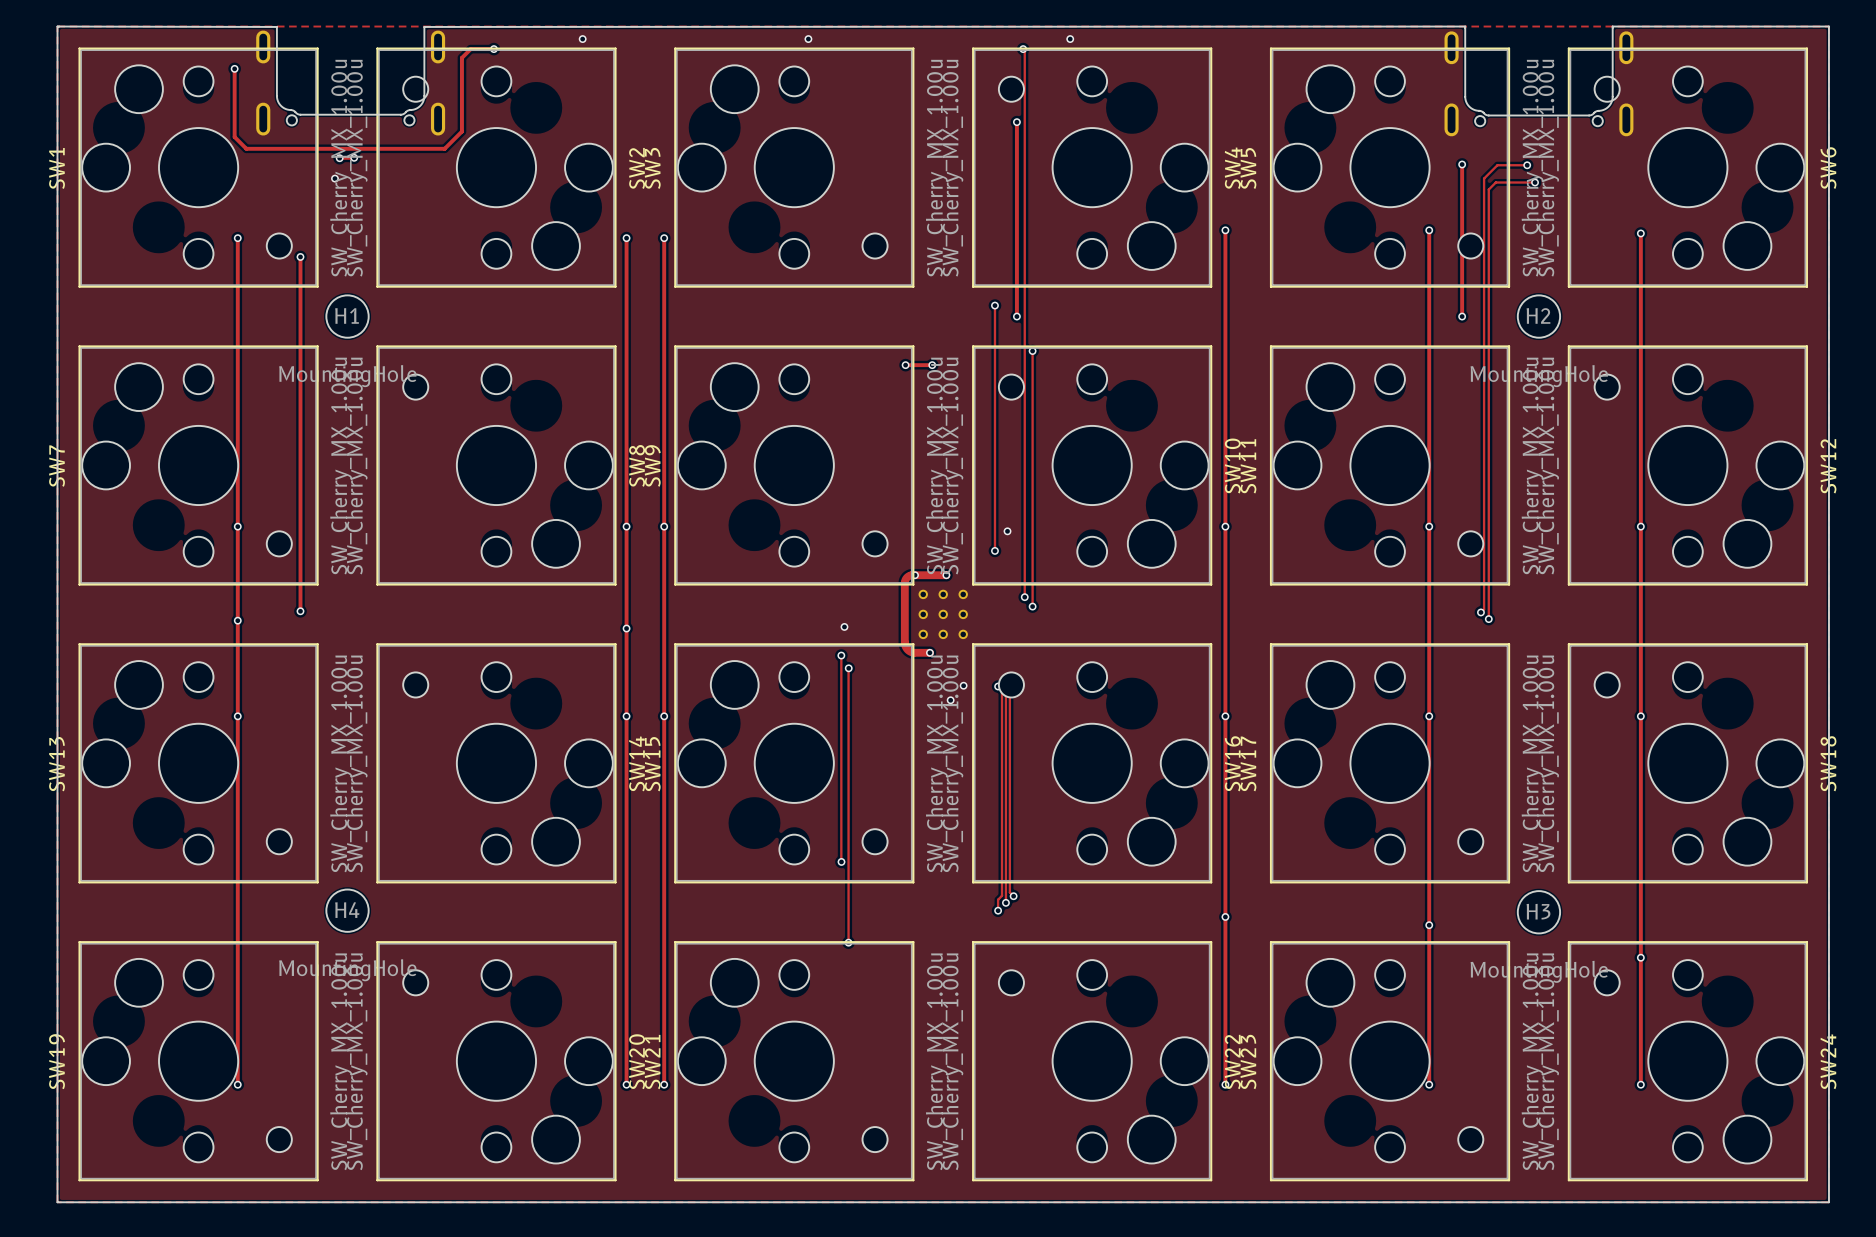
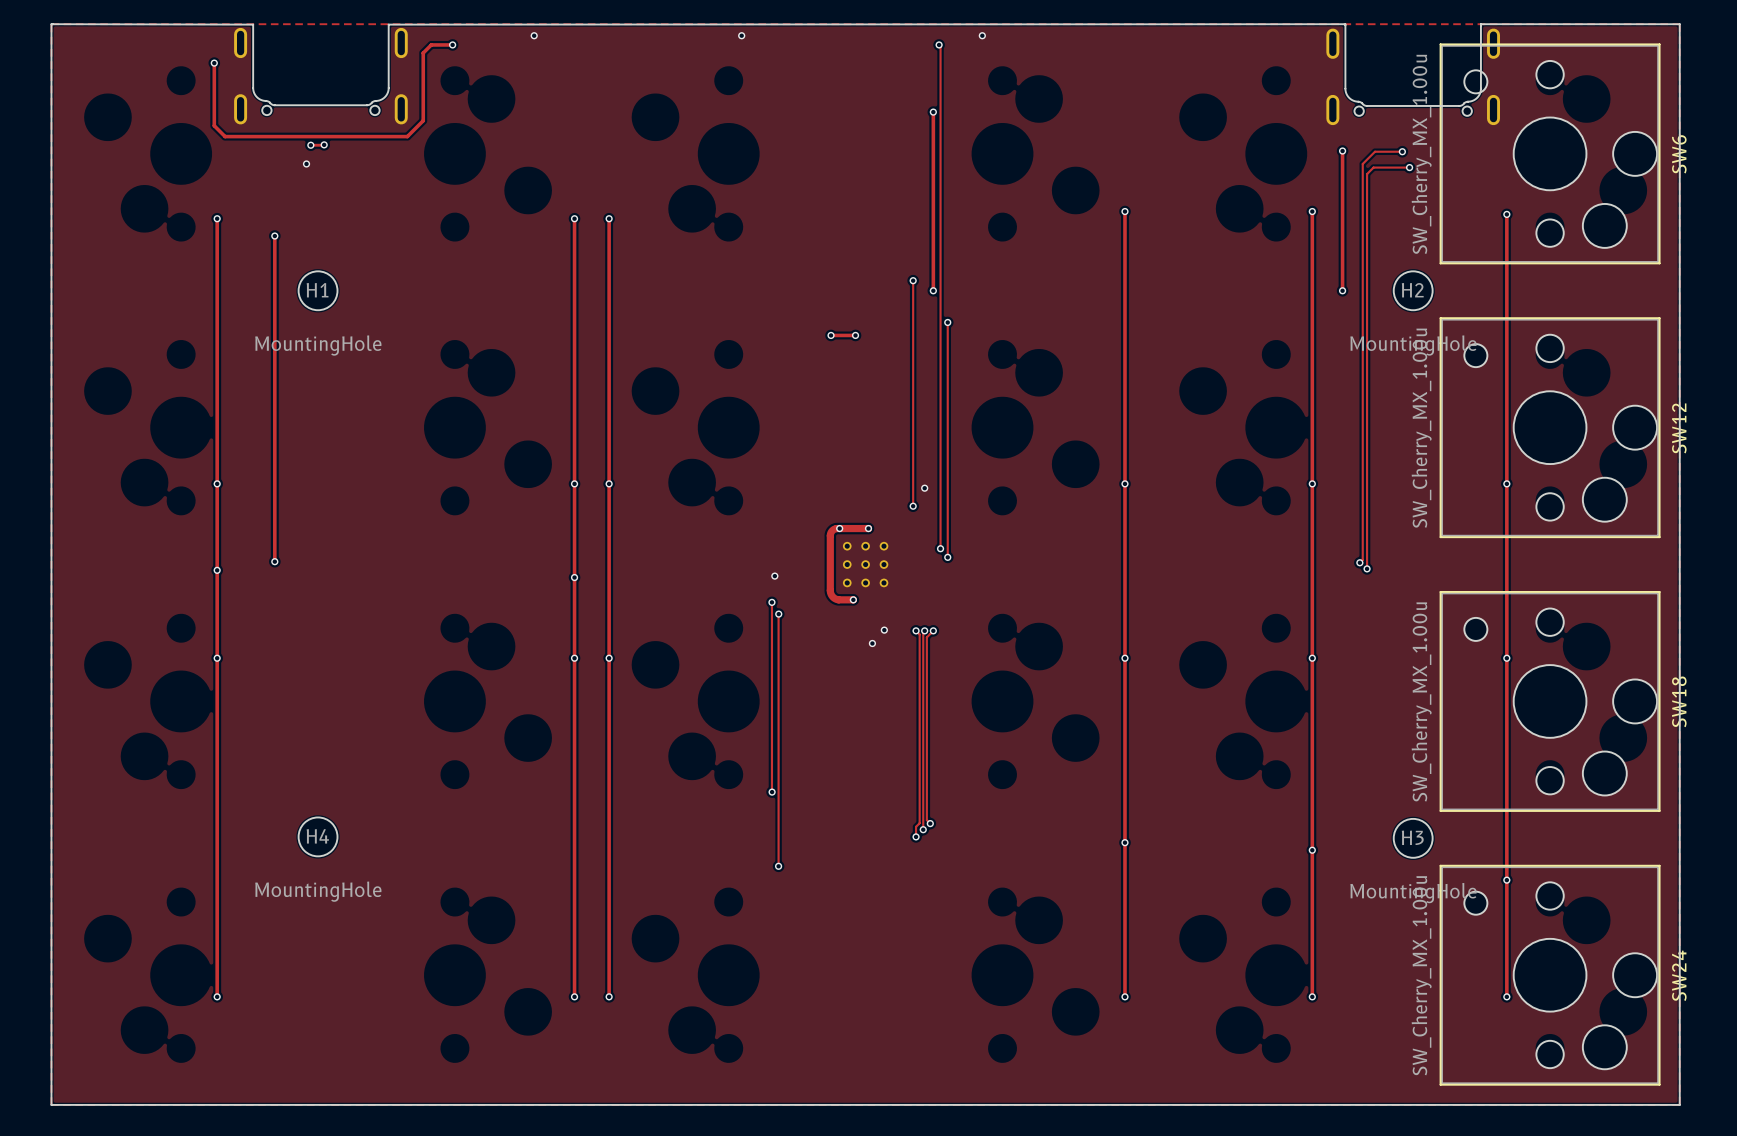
SW1: SW_Cherry_MX_1.00u (198, 167) -> none
SW2: SW_Cherry_MX_1.00u (496, 167) -> none
SW3: SW_Cherry_MX_1.00u (794, 167) -> none
SW4: SW_Cherry_MX_1.00u (1092, 167) -> none
SW5: SW_Cherry_MX_1.00u (1390, 167) -> none
SW7: SW_Cherry_MX_1.00u (198, 465) -> none
SW8: SW_Cherry_MX_1.00u (496, 465) -> none
SW9: SW_Cherry_MX_1.00u (794, 465) -> none
SW10: SW_Cherry_MX_1.00u (1092, 465) -> none
SW11: SW_Cherry_MX_1.00u (1390, 465) -> none
SW13: SW_Cherry_MX_1.00u (198, 763) -> none
SW14: SW_Cherry_MX_1.00u (496, 763) -> none
SW15: SW_Cherry_MX_1.00u (794, 763) -> none
SW16: SW_Cherry_MX_1.00u (1092, 763) -> none
SW17: SW_Cherry_MX_1.00u (1390, 763) -> none
SW19: SW_Cherry_MX_1.00u (198, 1061) -> none
SW20: SW_Cherry_MX_1.00u (496, 1061) -> none
SW21: SW_Cherry_MX_1.00u (794, 1061) -> none
SW22: SW_Cherry_MX_1.00u (1092, 1061) -> none
SW23: SW_Cherry_MX_1.00u (1390, 1061) -> none

